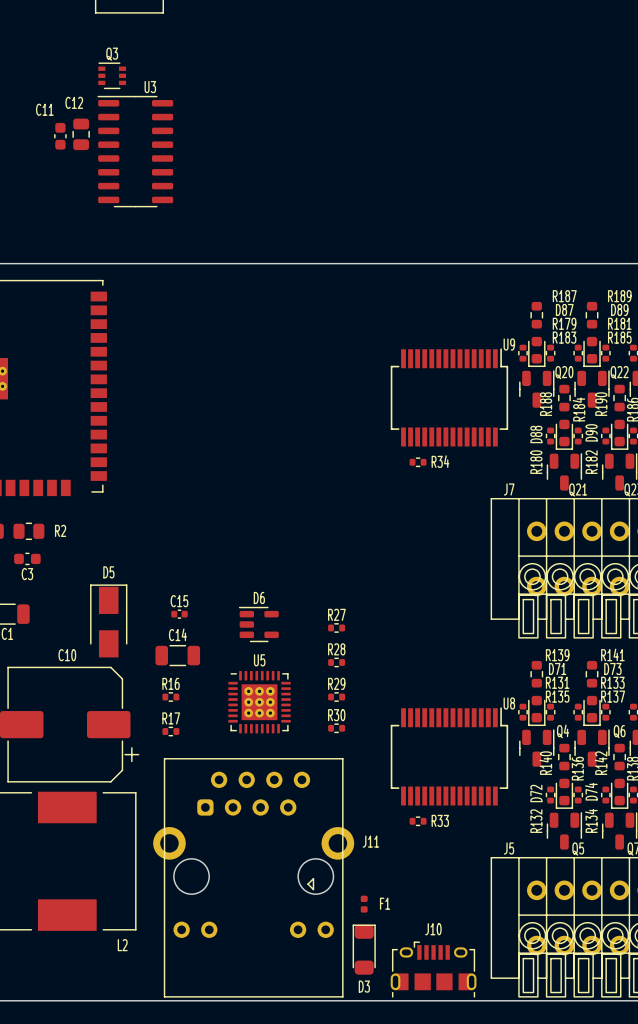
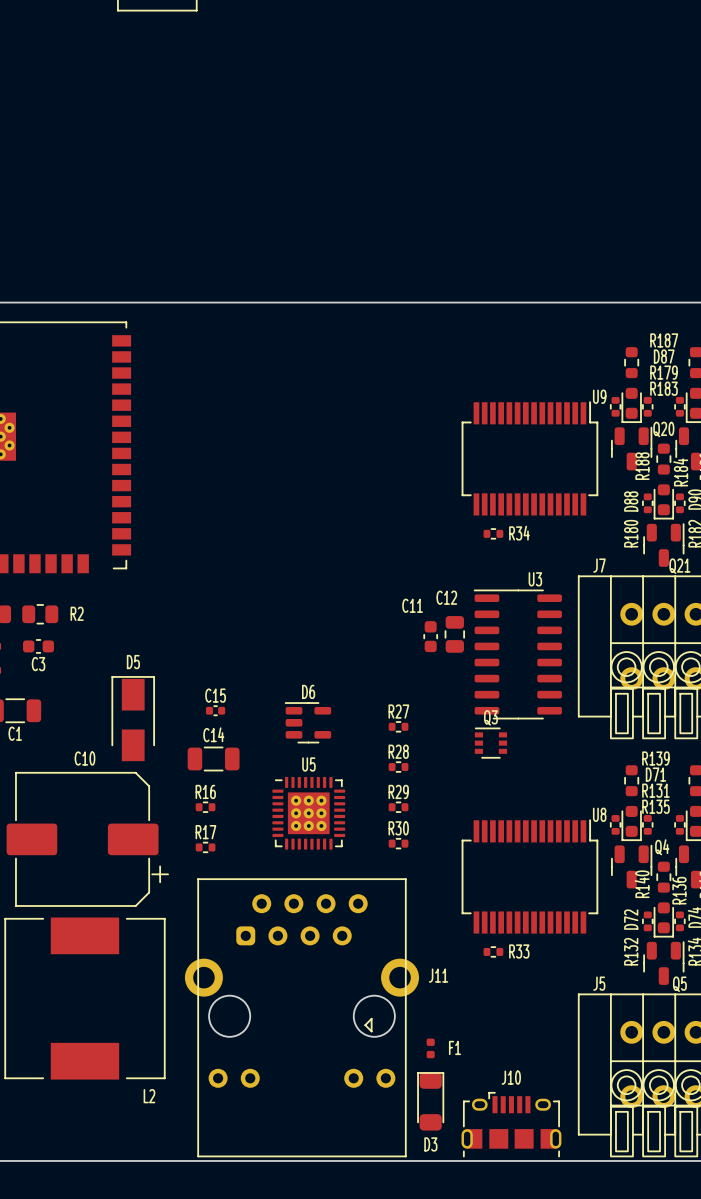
Q3 position: (112, 75) -> (490, 743)
C12 position: (81, 134) -> (454, 634)
C11 position: (60, 136) -> (430, 636)
U3 position: (135, 151) -> (517, 654)

